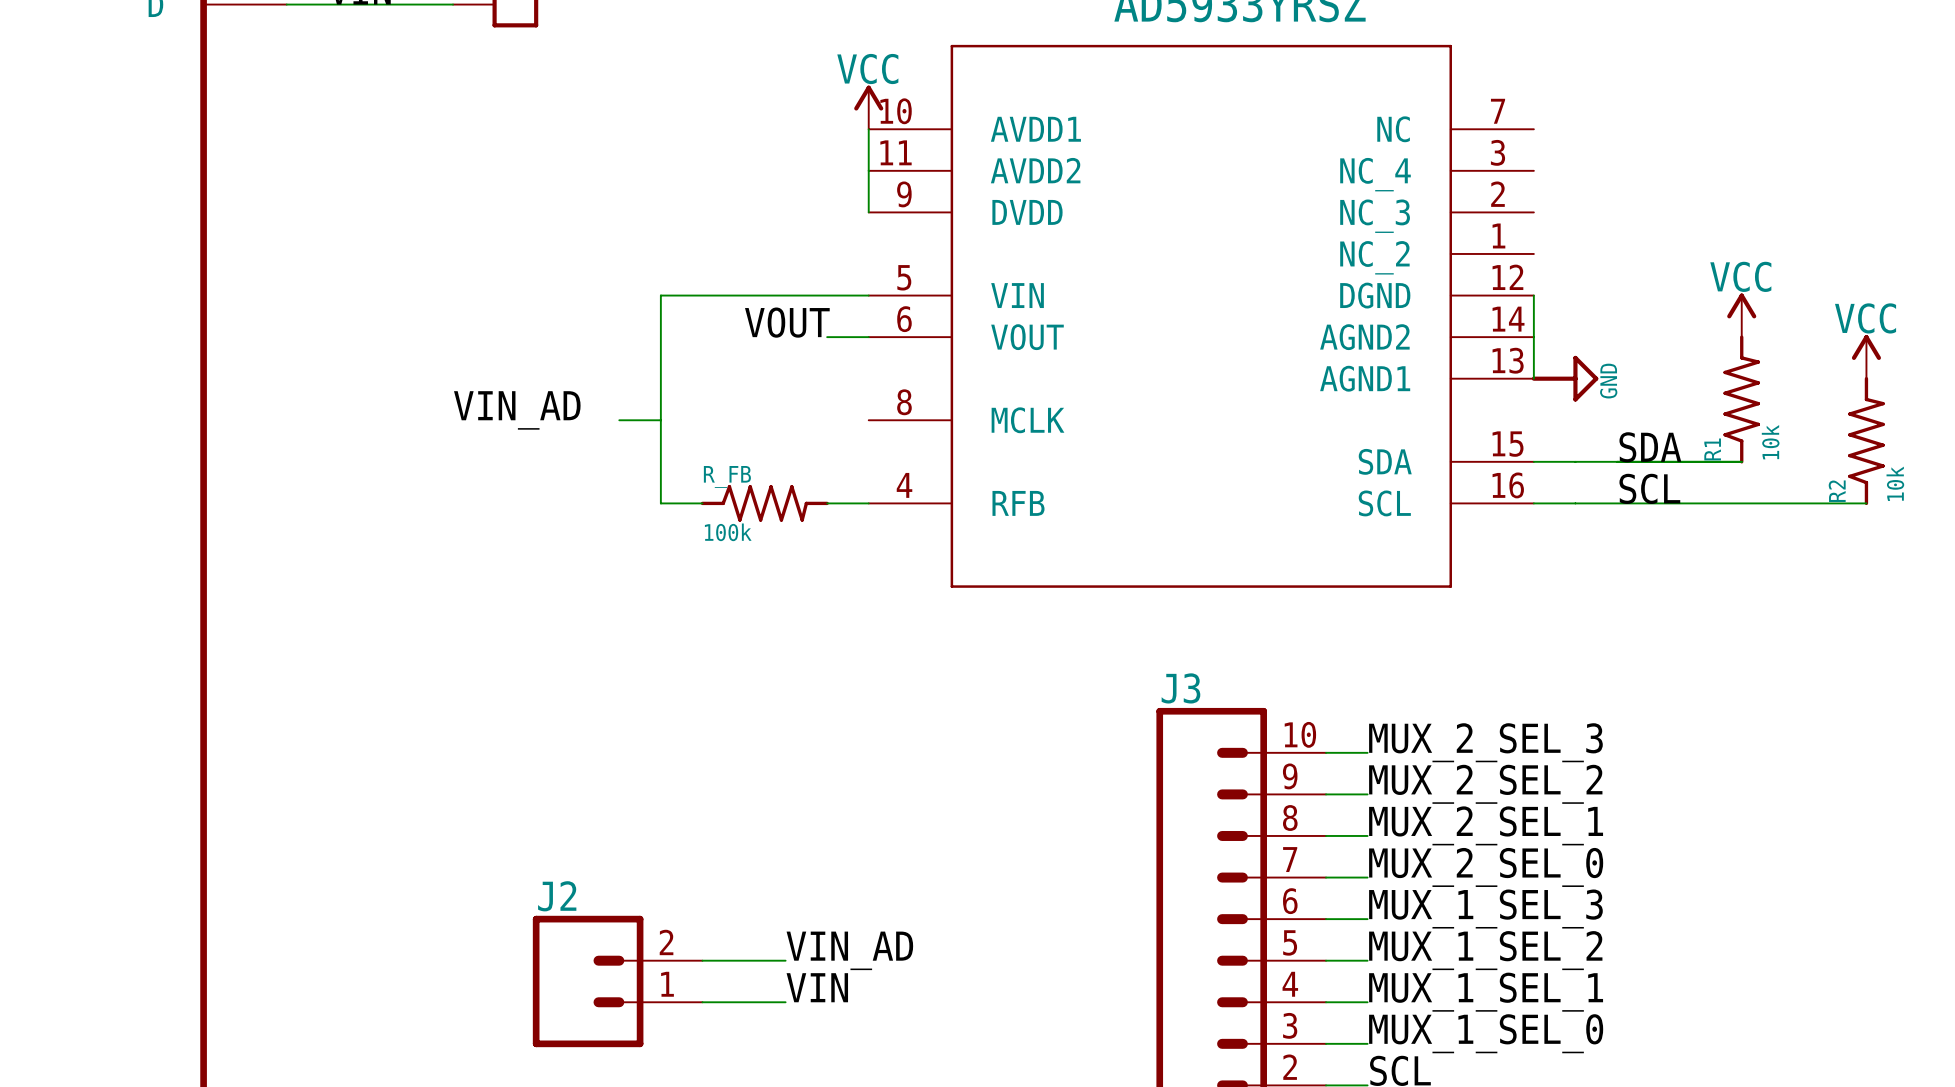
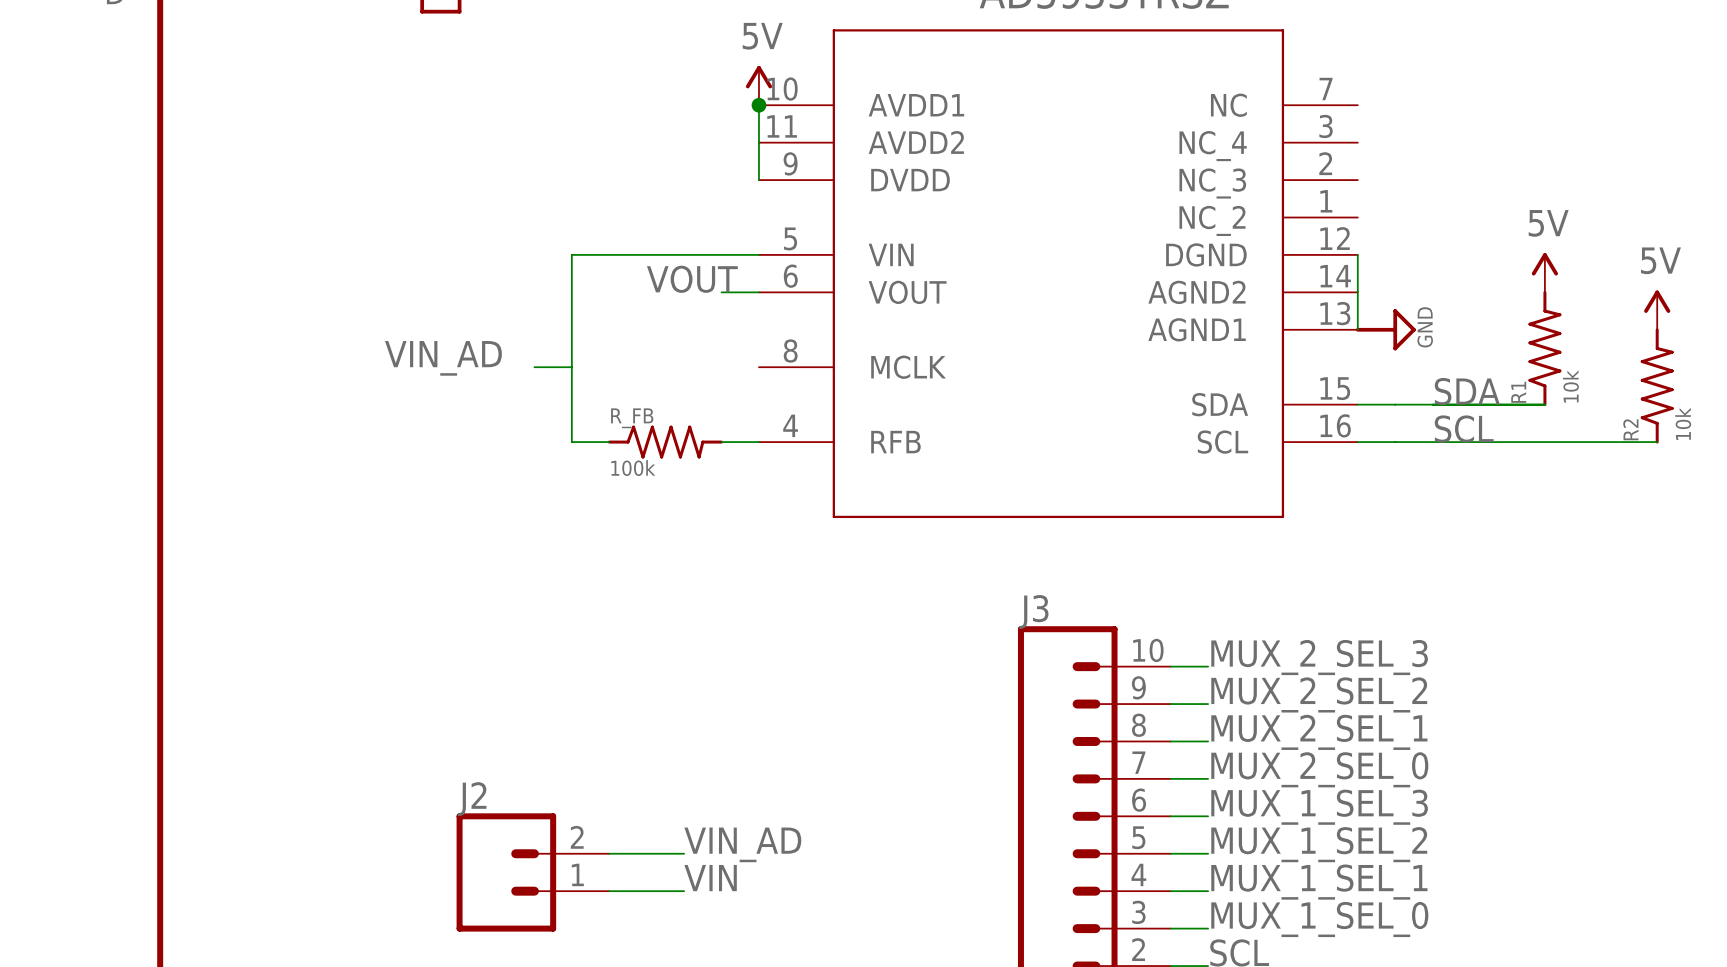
power symbol: VCC (868, 107) -> 5V (758, 85)
junction: none -> (758, 105)
power symbol: VCC (1741, 315) -> 5V (1544, 272)
power symbol: VCC (1866, 356) -> 5V (1657, 310)

